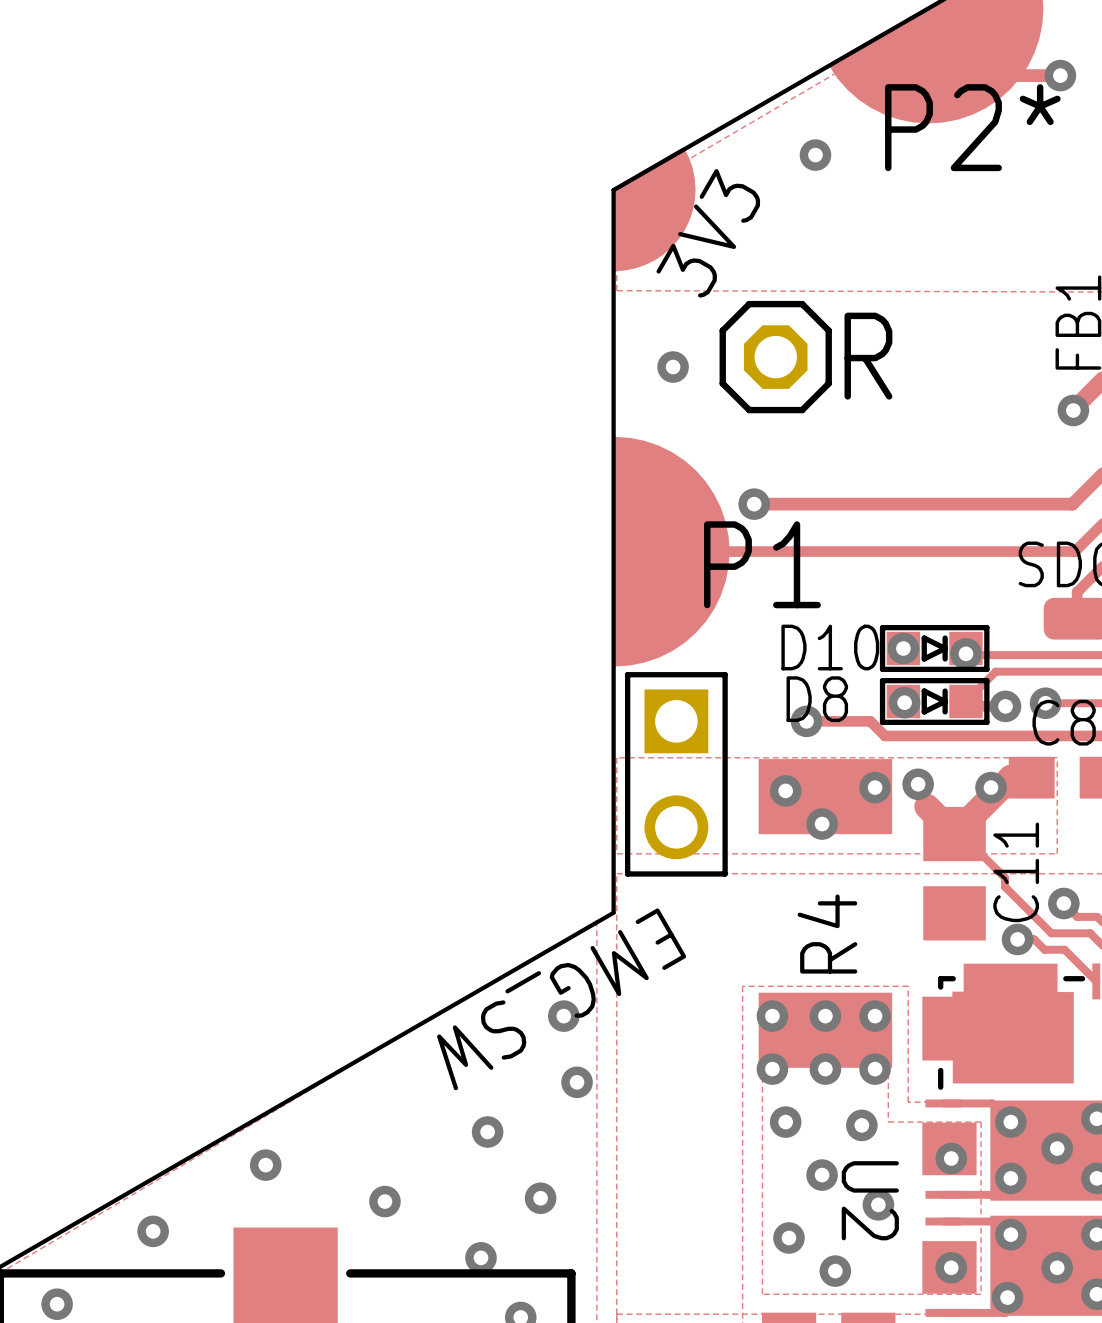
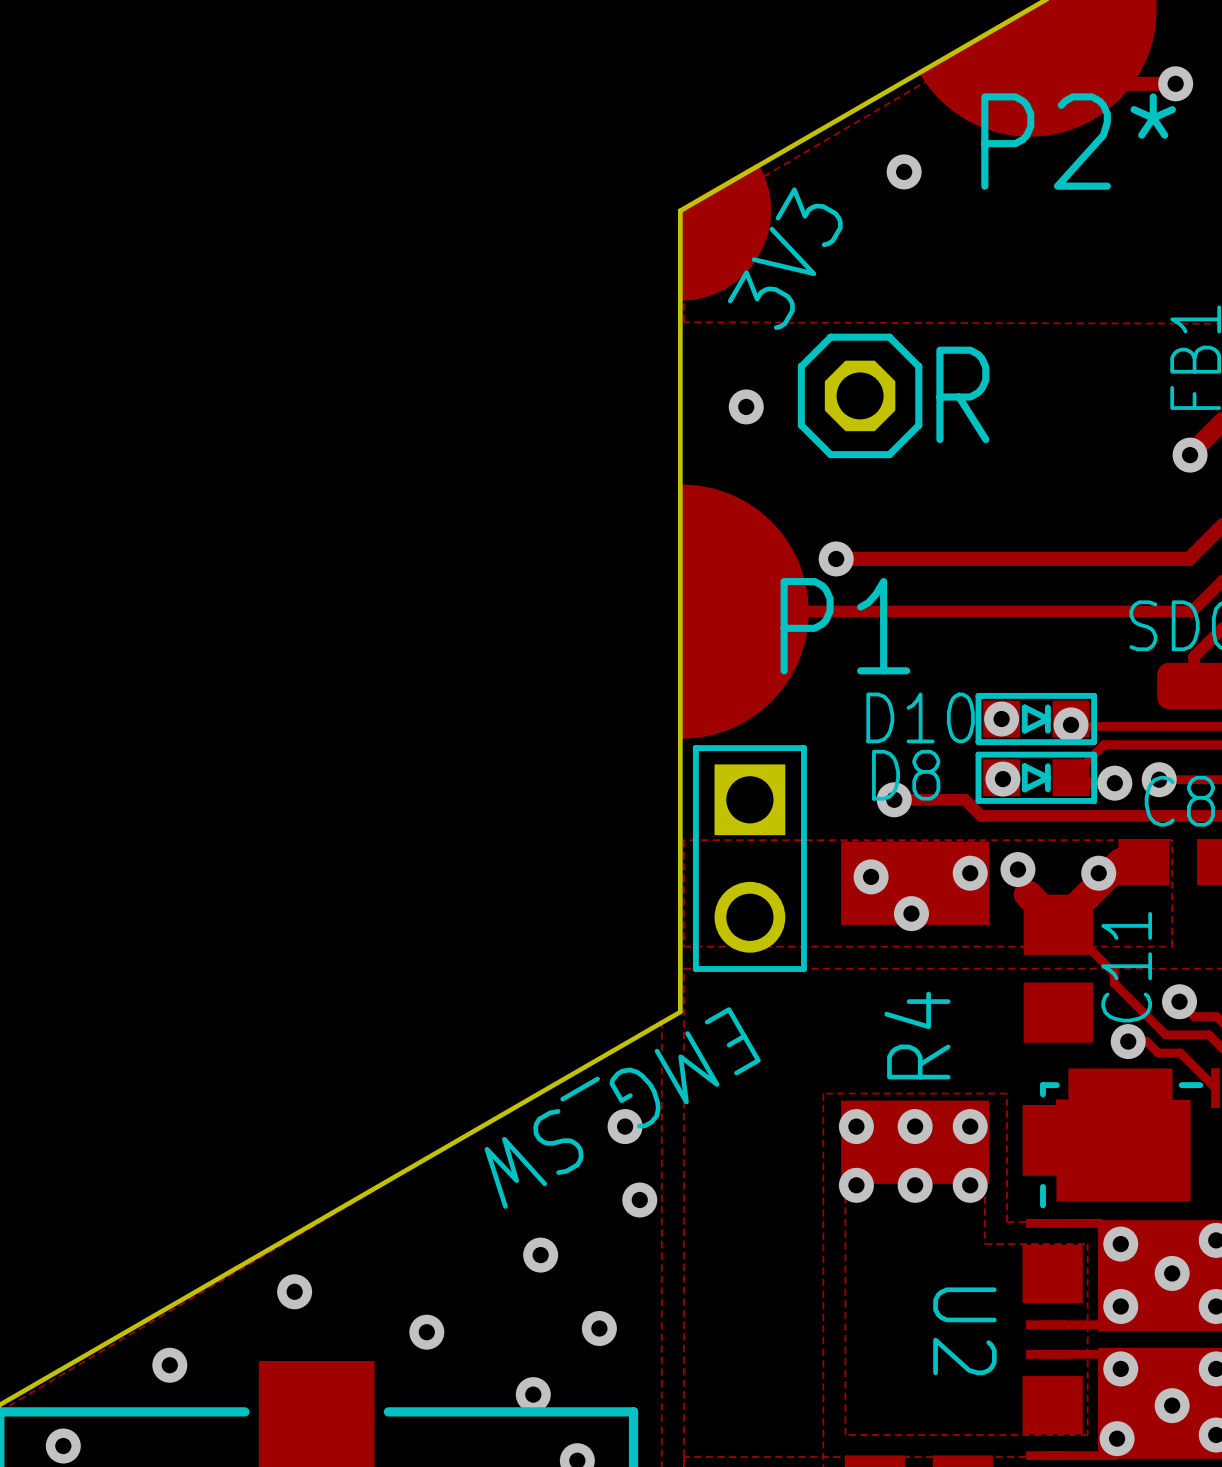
via: (785, 1122) -> none
via: (861, 1125) -> none
via: (951, 1158) -> none
via: (822, 1175) -> none
via: (878, 1204) -> none
via: (788, 1237) -> none
via: (951, 1267) -> none
via: (835, 1271) -> none

